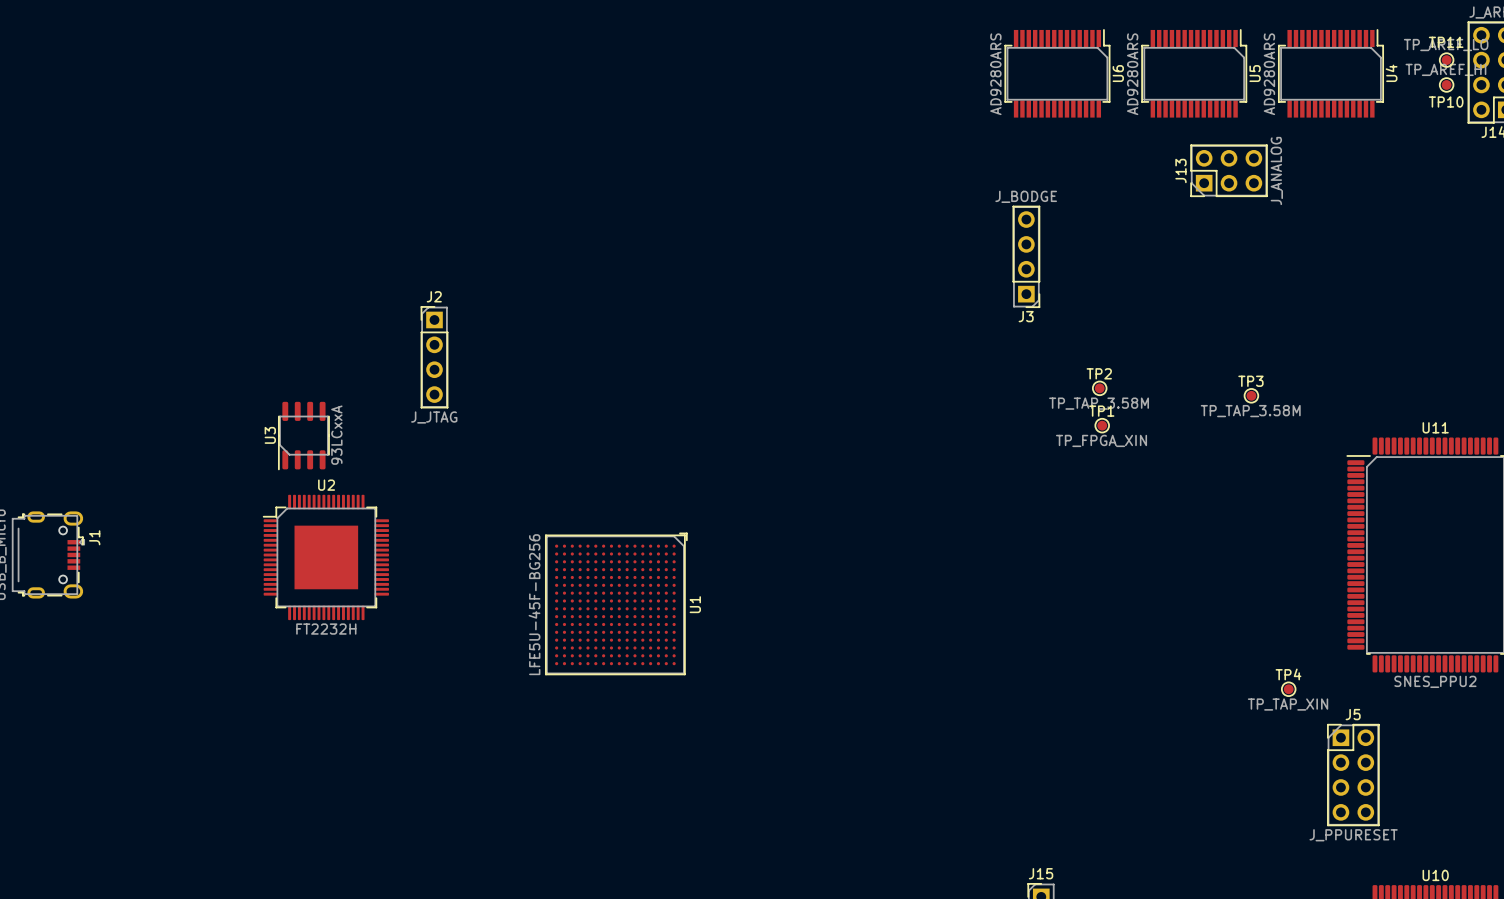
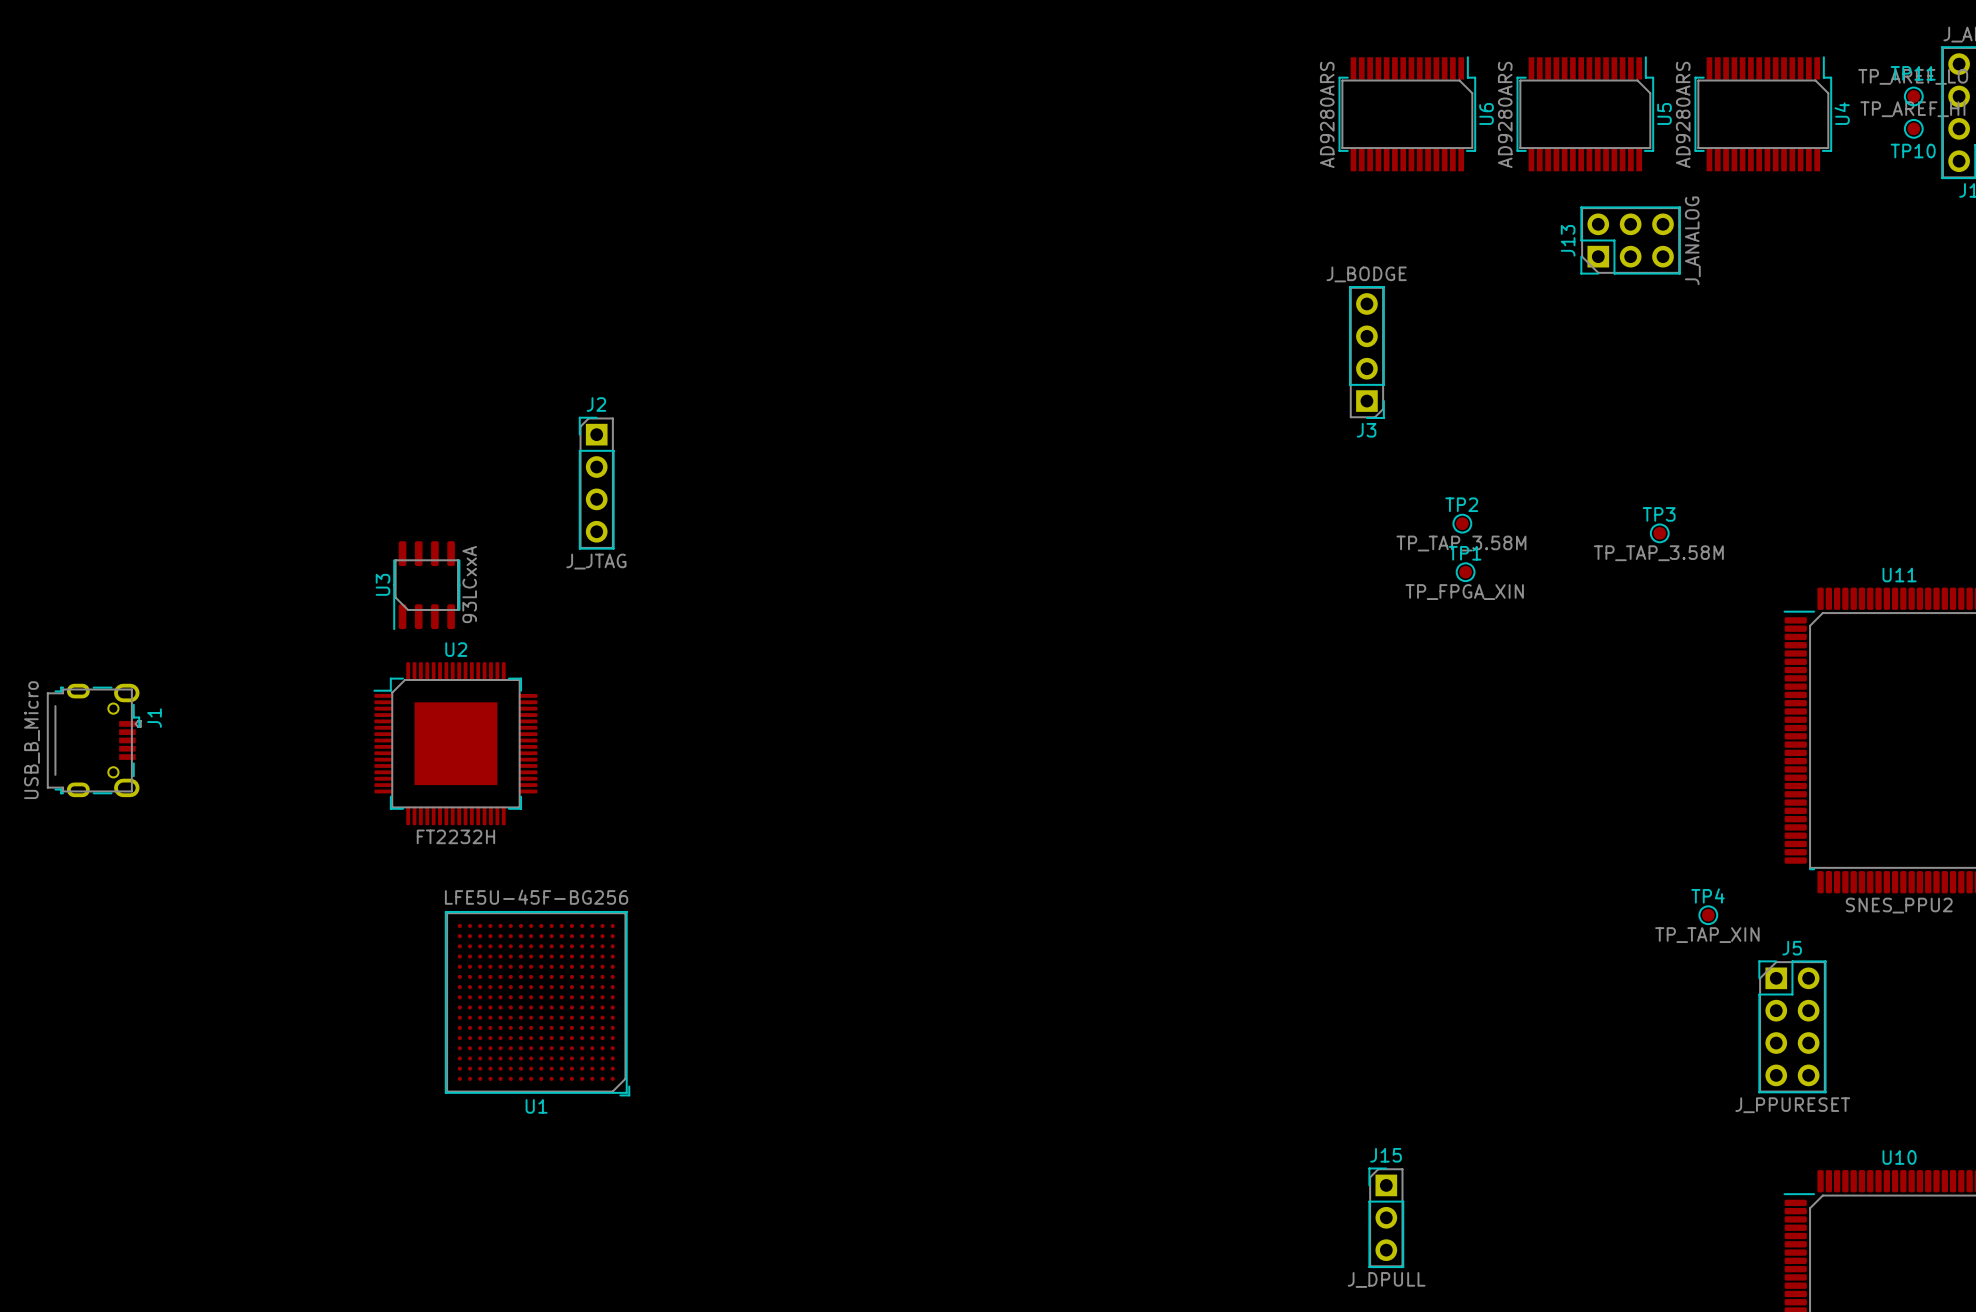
U1 rotation: 0° (616, 603) -> 90° clockwise (537, 1003)
U1 position: (616, 603) -> (537, 1003)

